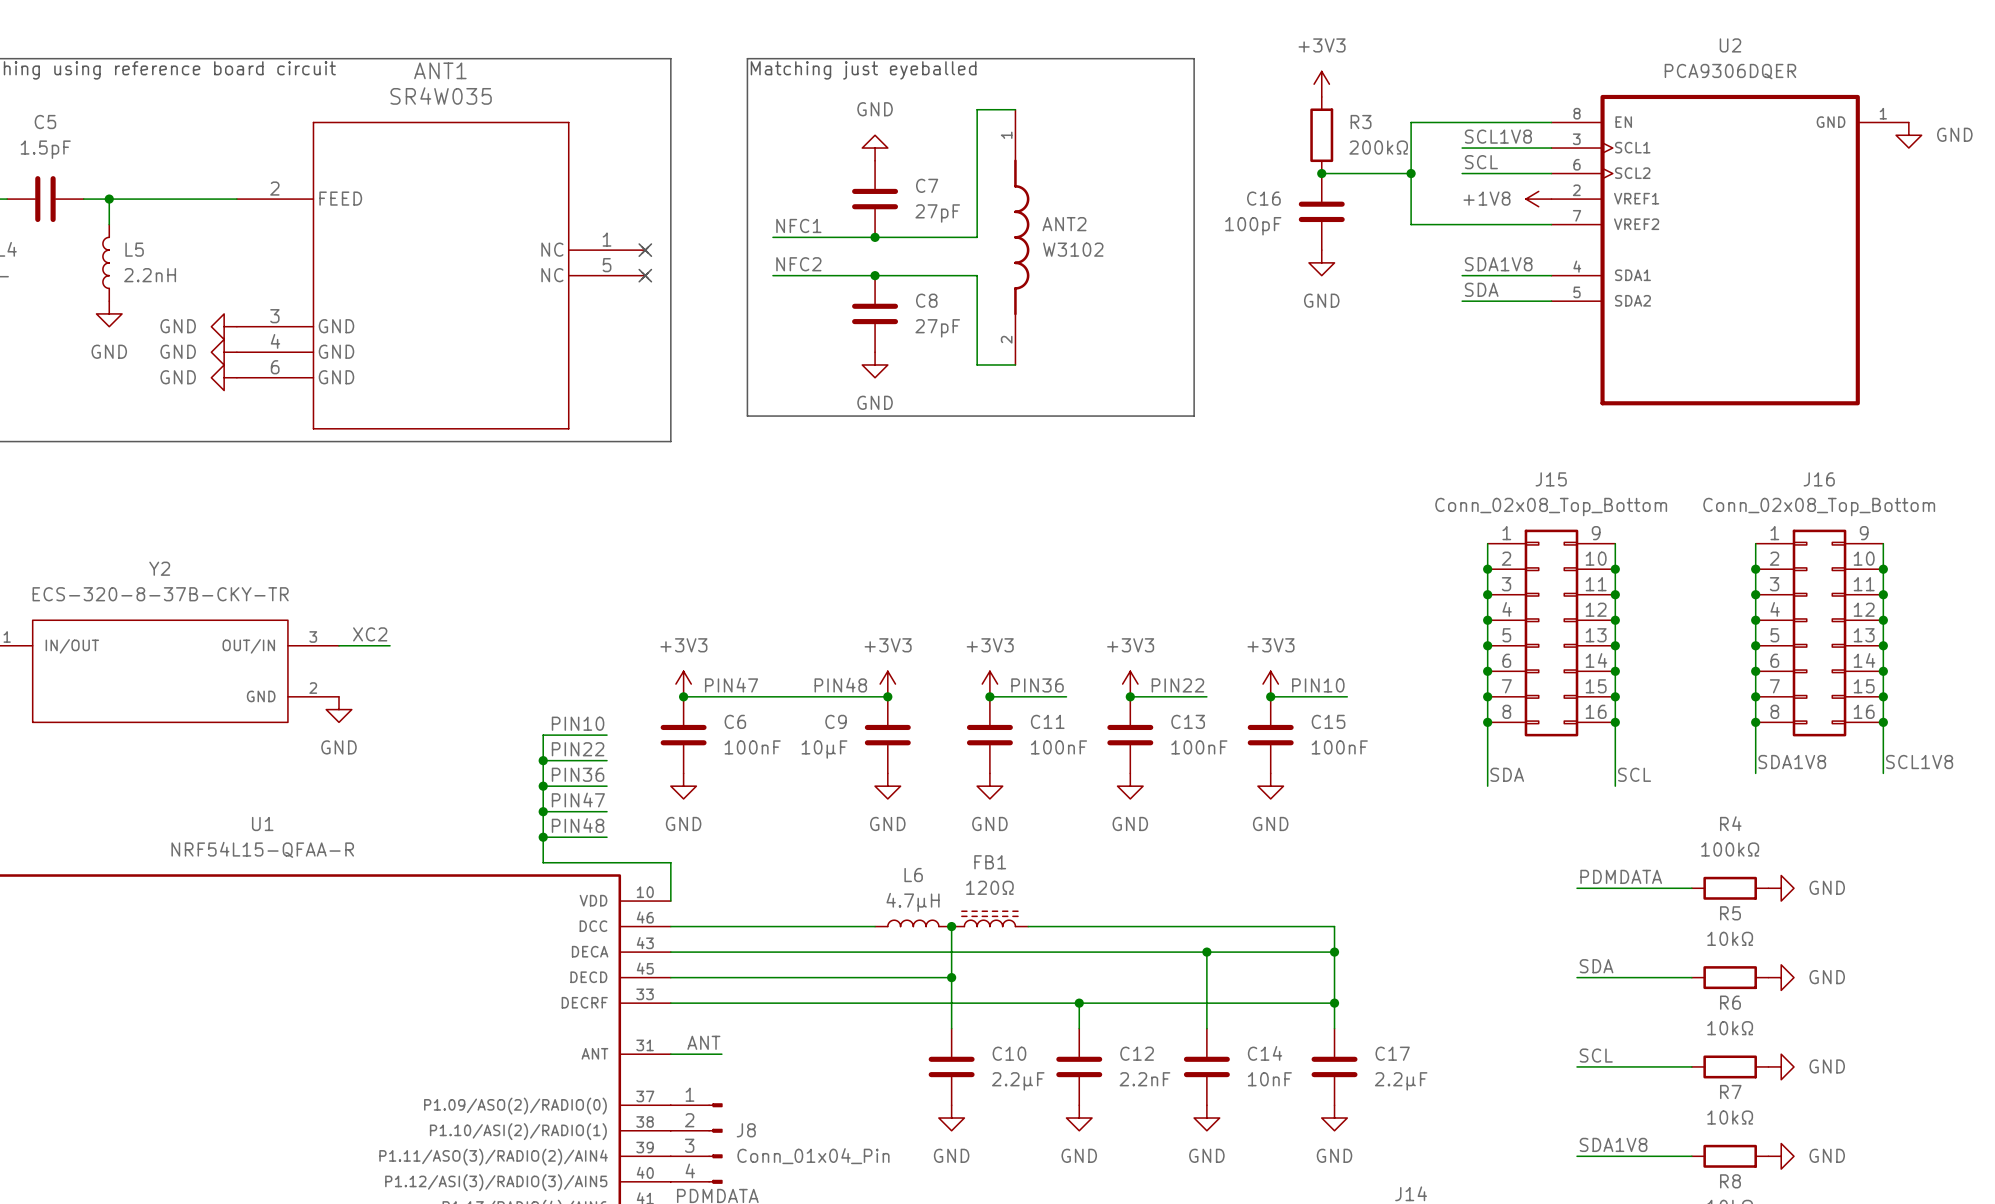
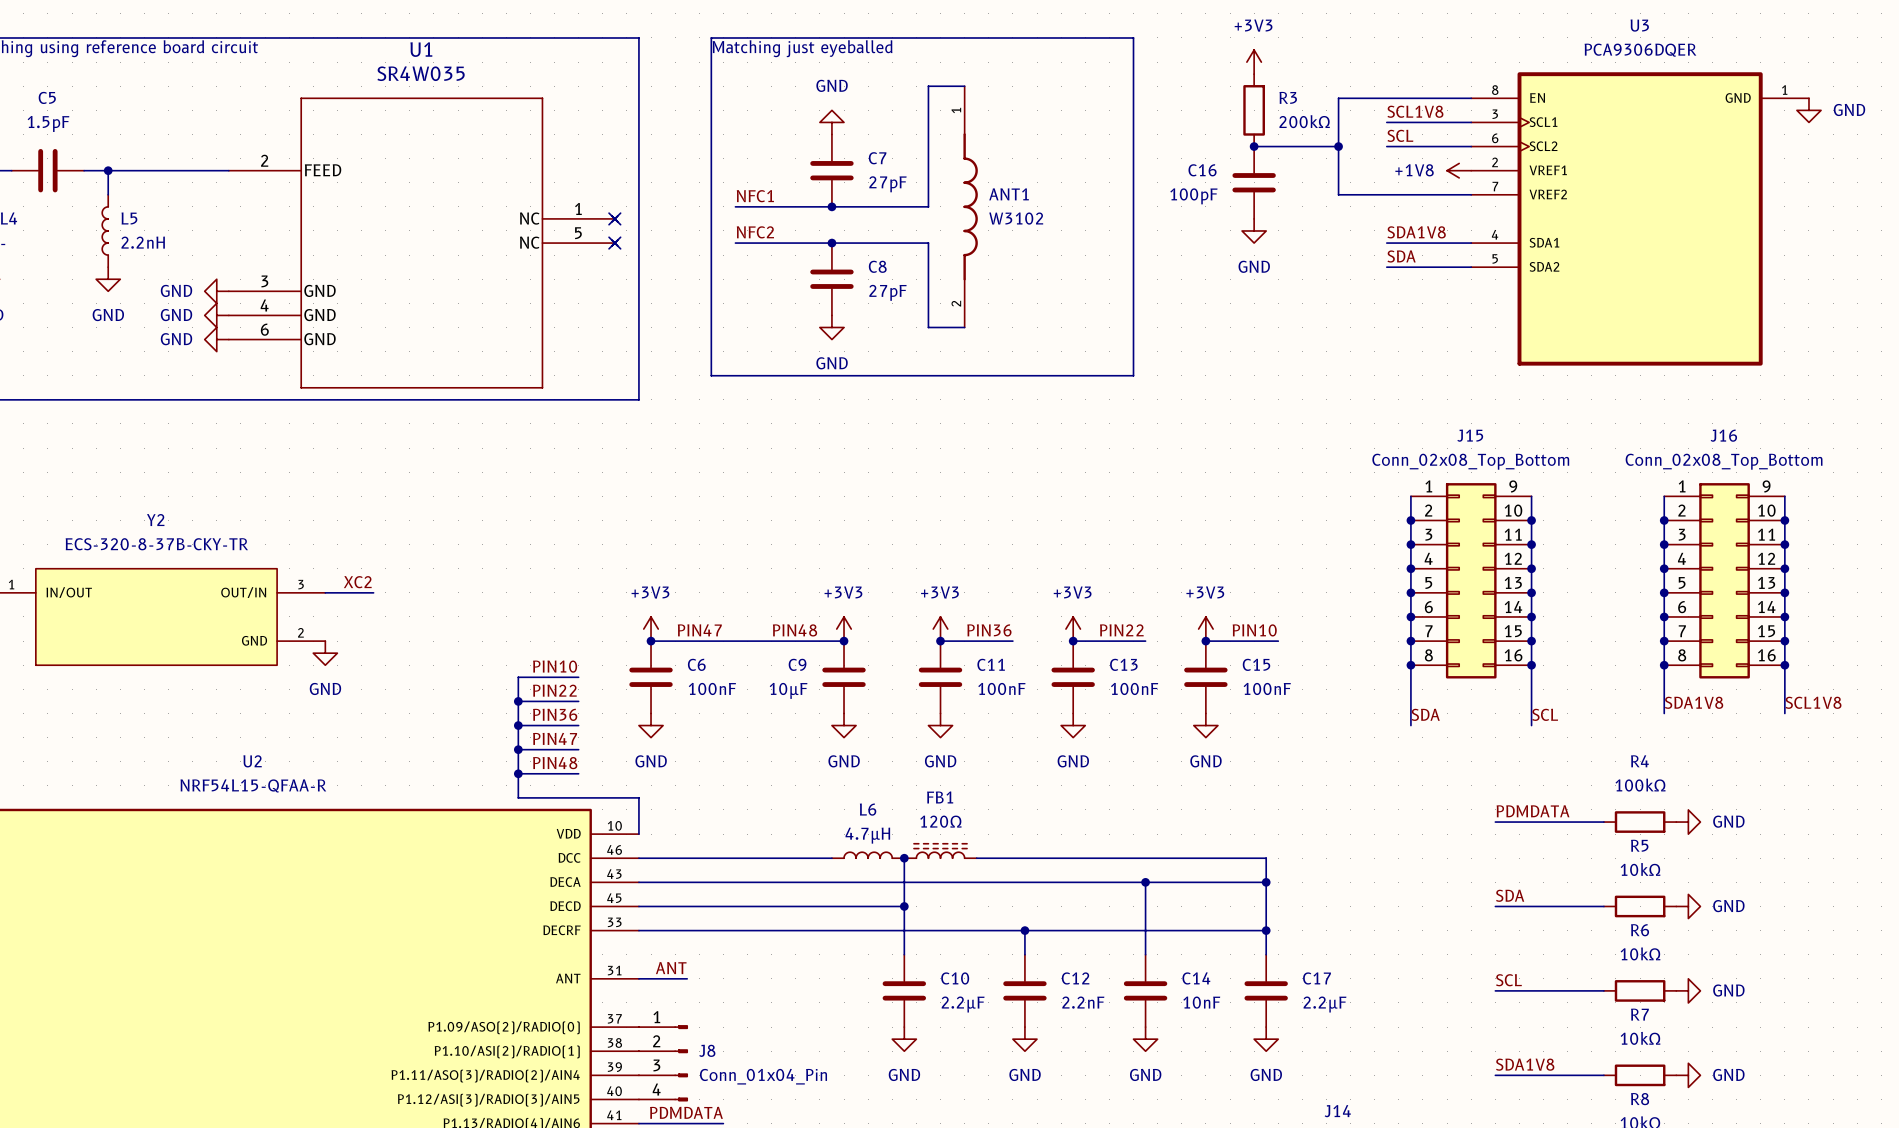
U2 name: U2 (1730, 45) -> U3 (1639, 25)
ANT1 name: ANT1 (440, 70) -> U1 (421, 49)
ANT2 name: ANT2 (1064, 224) -> ANT1 (1009, 194)
U1 name: U1 (262, 823) -> U2 (252, 761)

